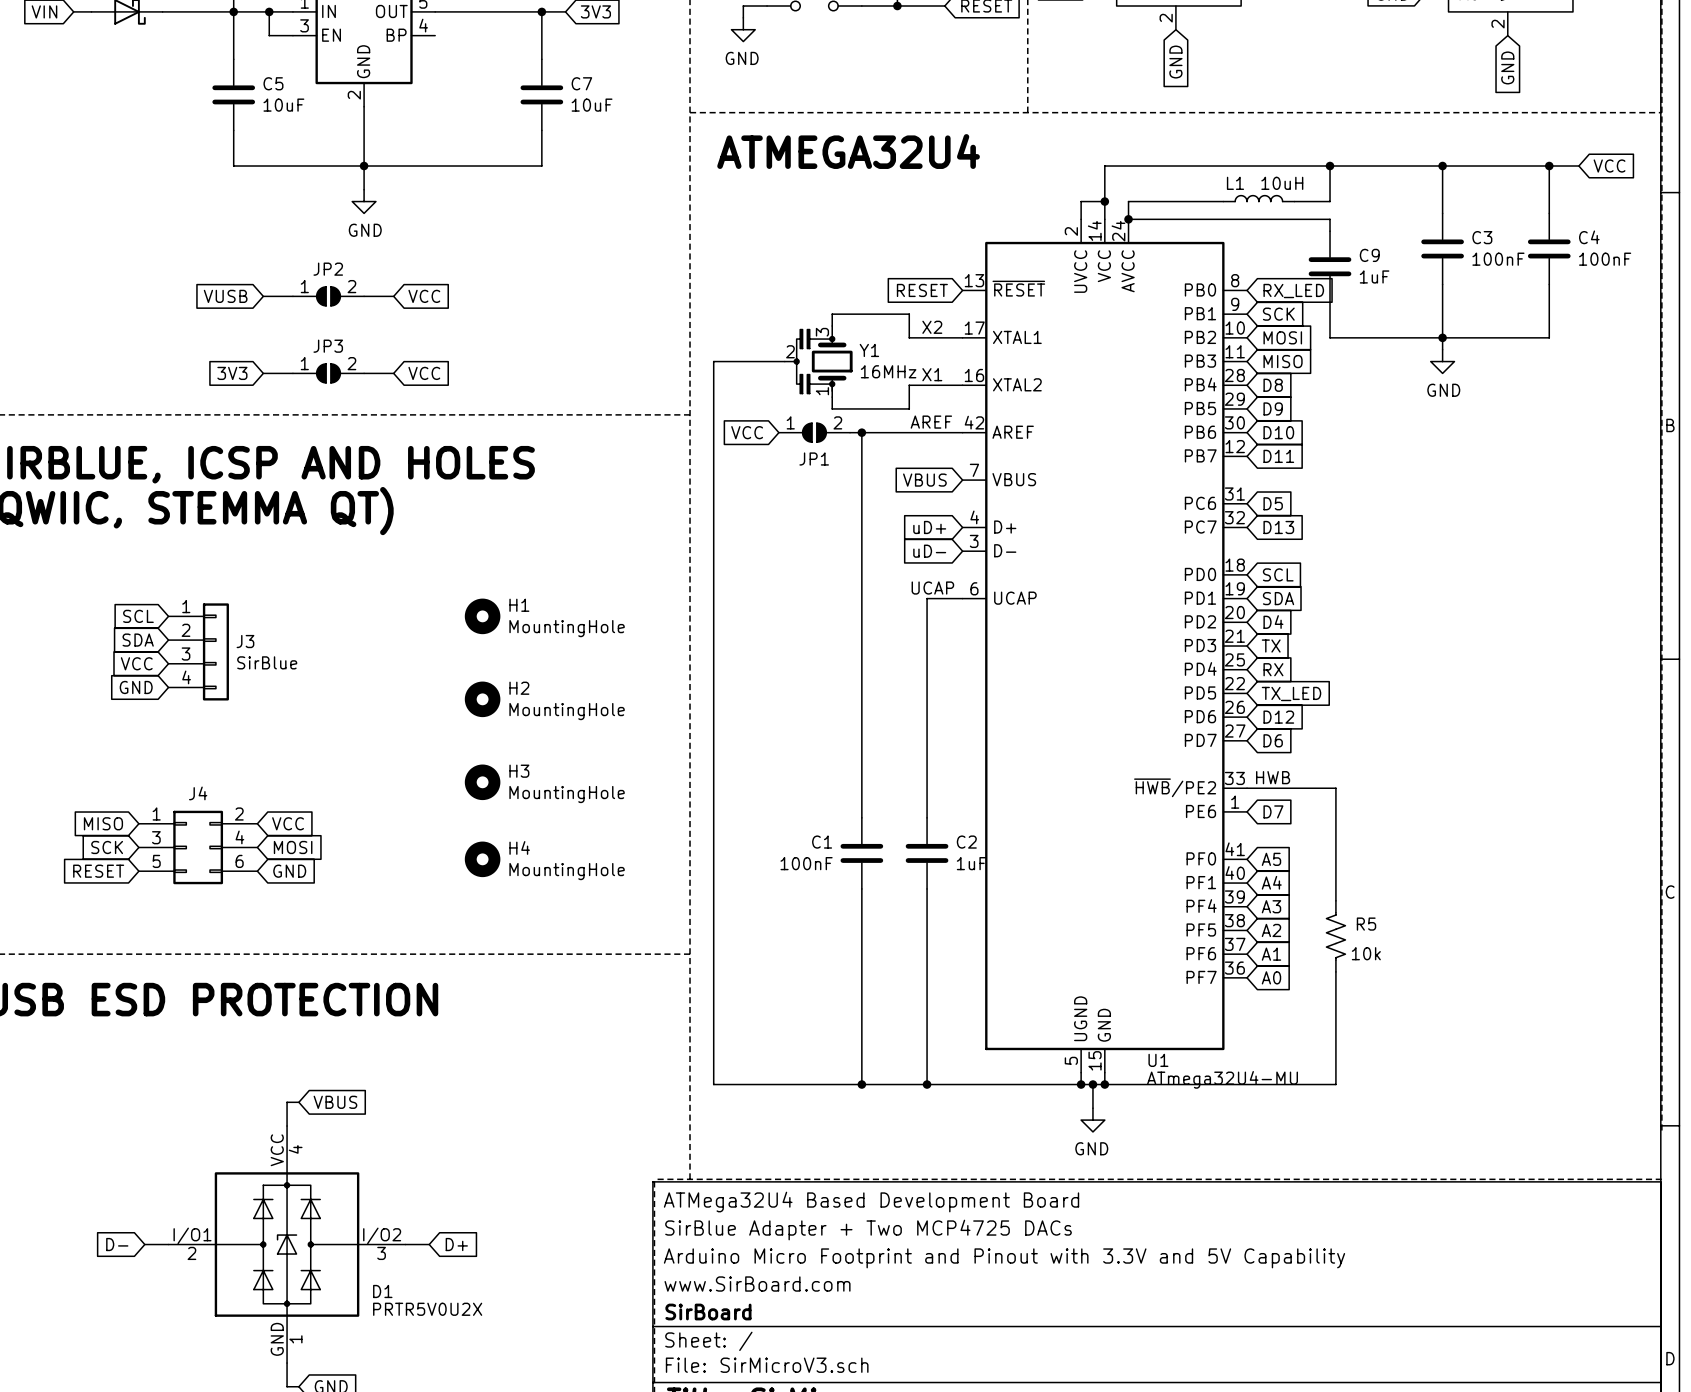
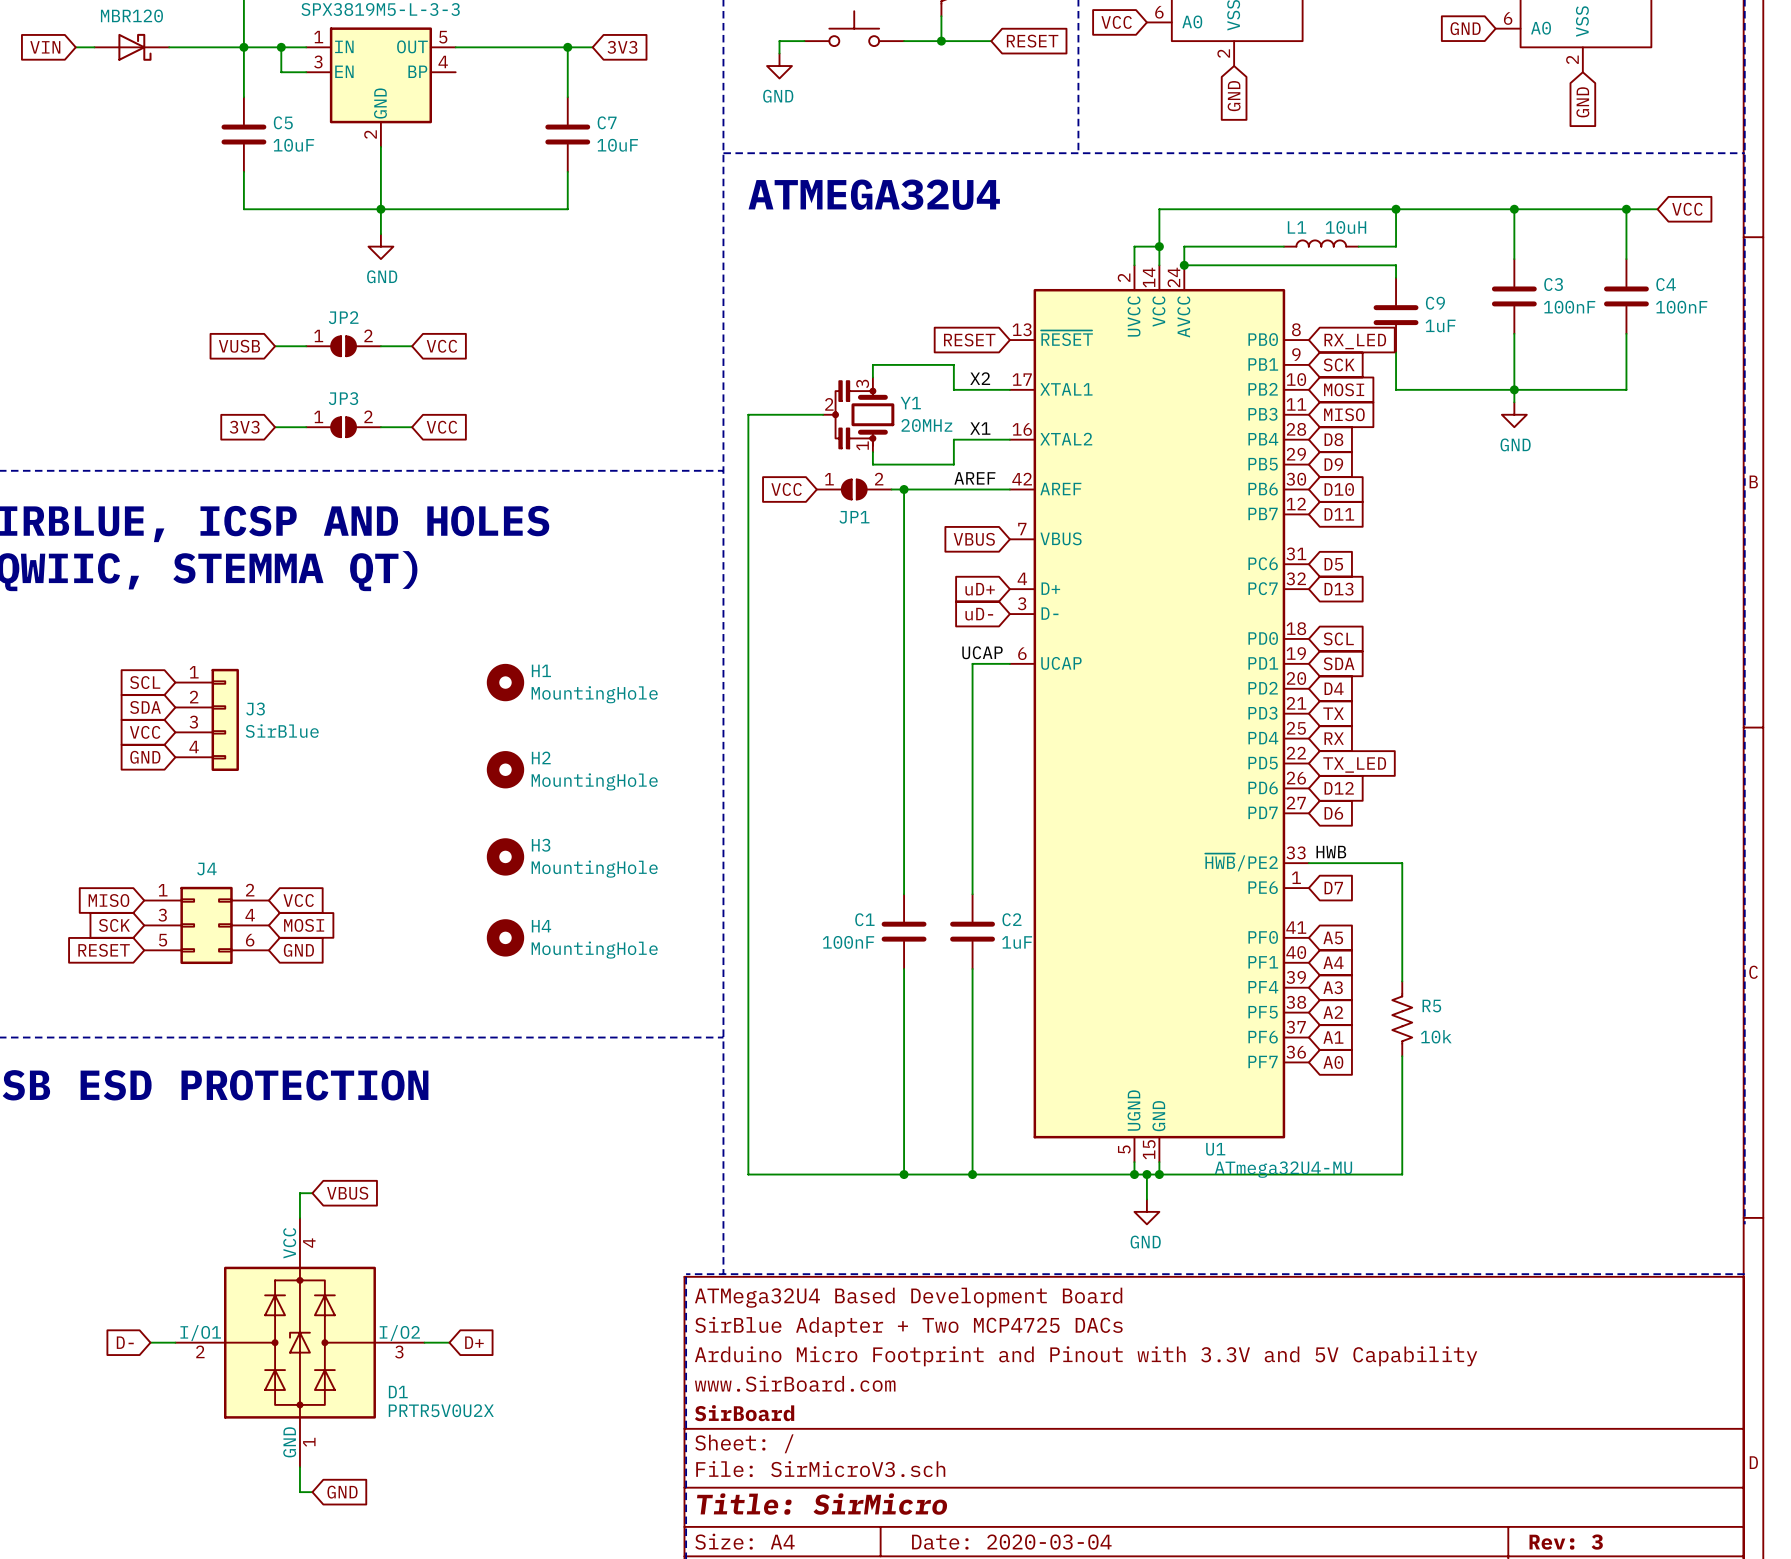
Y1 value: 16MHz (888, 371) -> 20MHz (926, 425)

